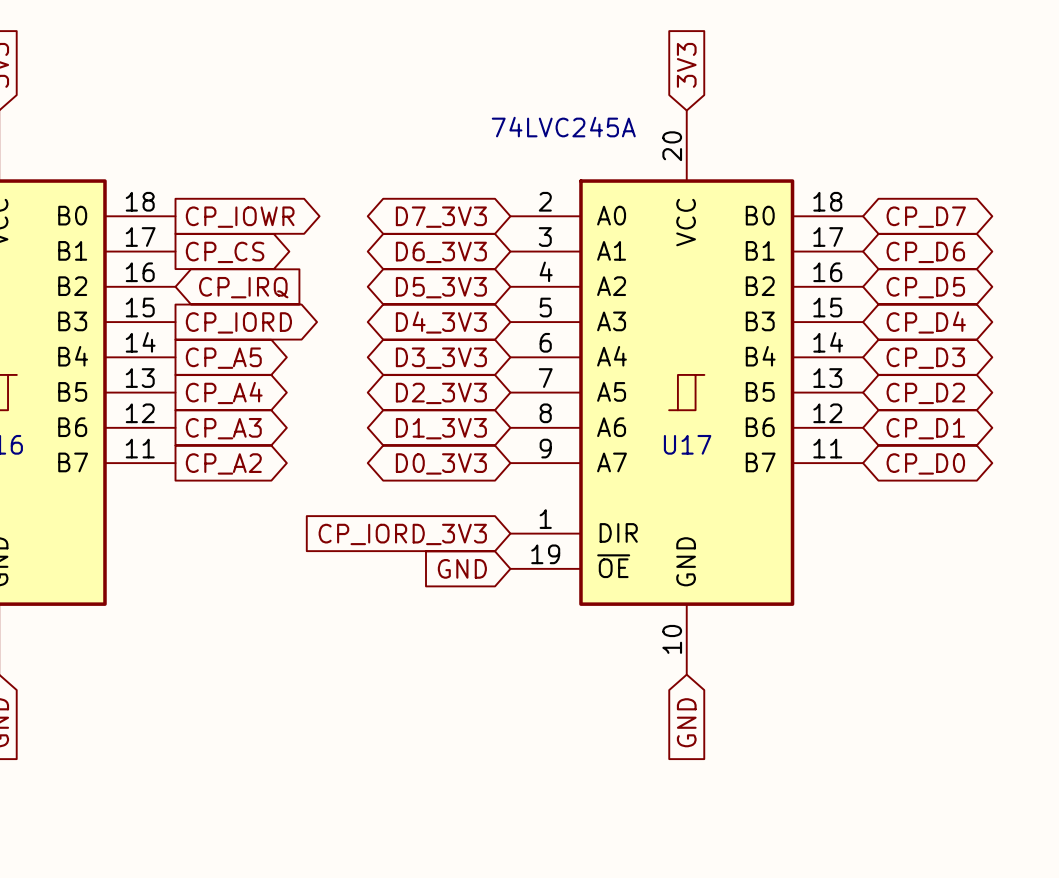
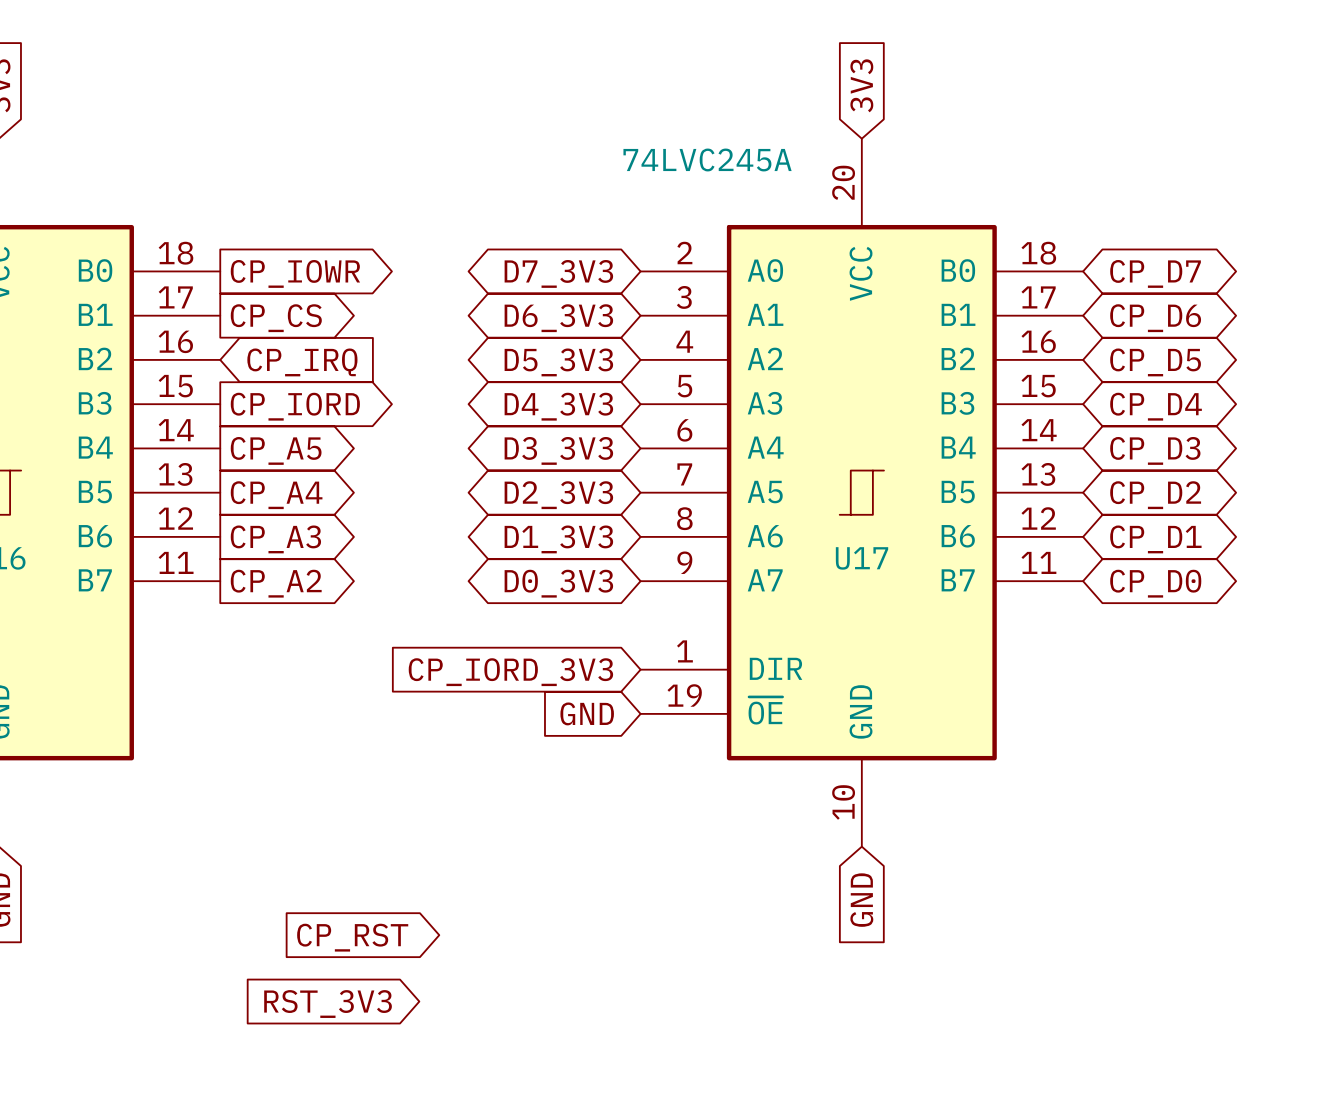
global label: none -> CP_RST (352, 937)
global label: none -> RST_3V3 (328, 1004)

